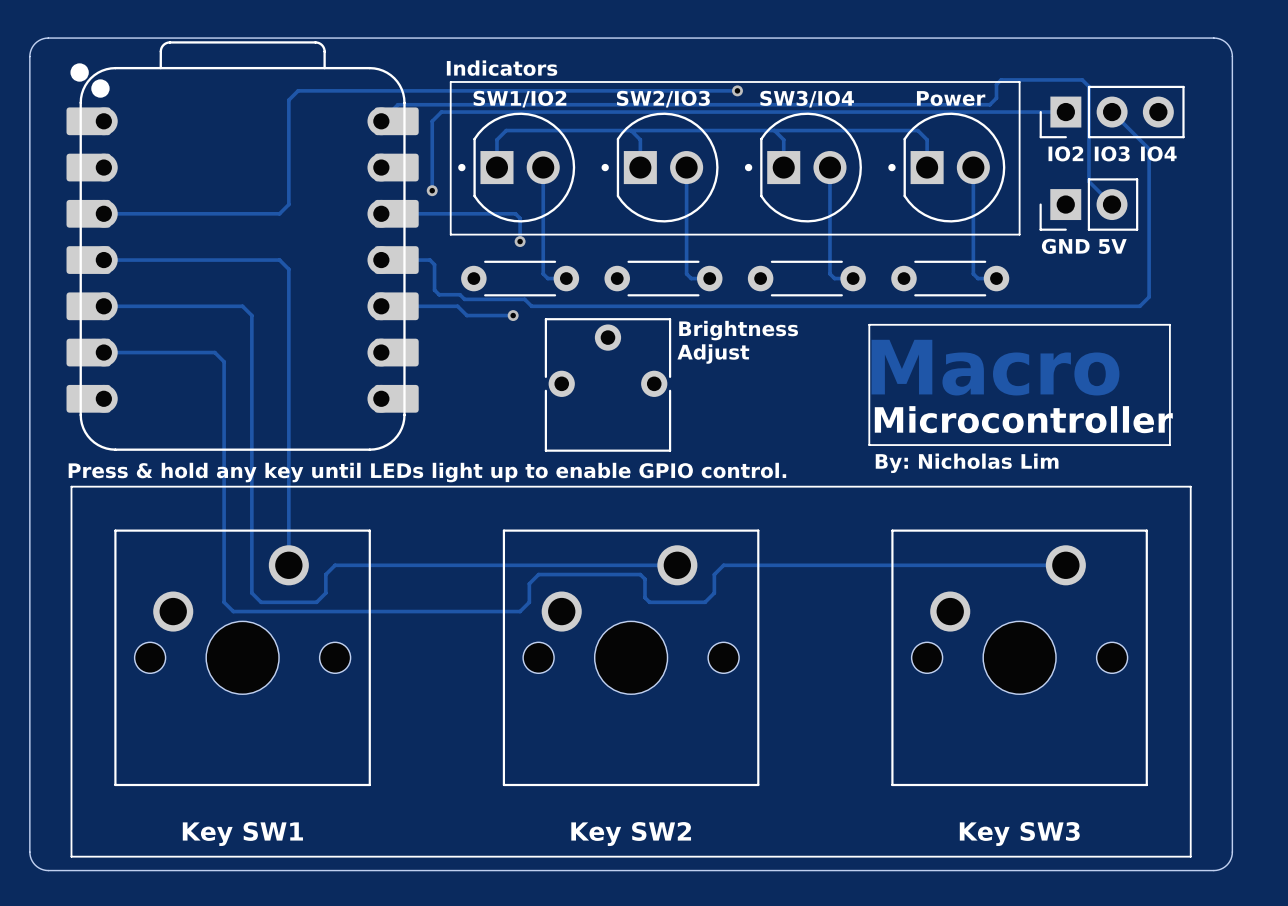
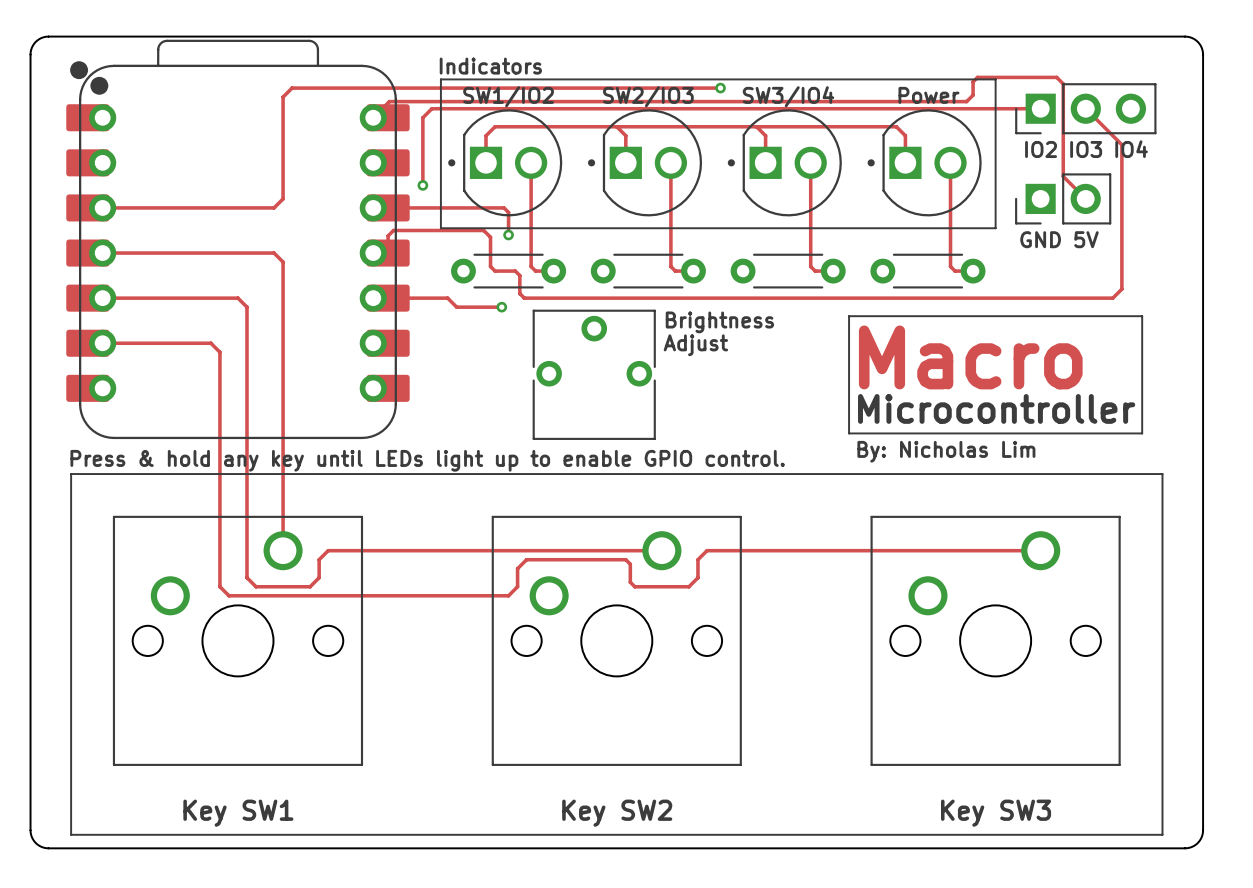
track: (381, 260) (429, 260) (434, 264) (434, 290) (439, 294) (459, 294) (464, 299) (524, 299) (531, 306) (536, 306) -> (388, 253) (388, 235) (393, 230) (483, 230) (490, 237) (490, 266) (495, 271) (515, 271) (519, 275) (519, 293) (524, 298)

